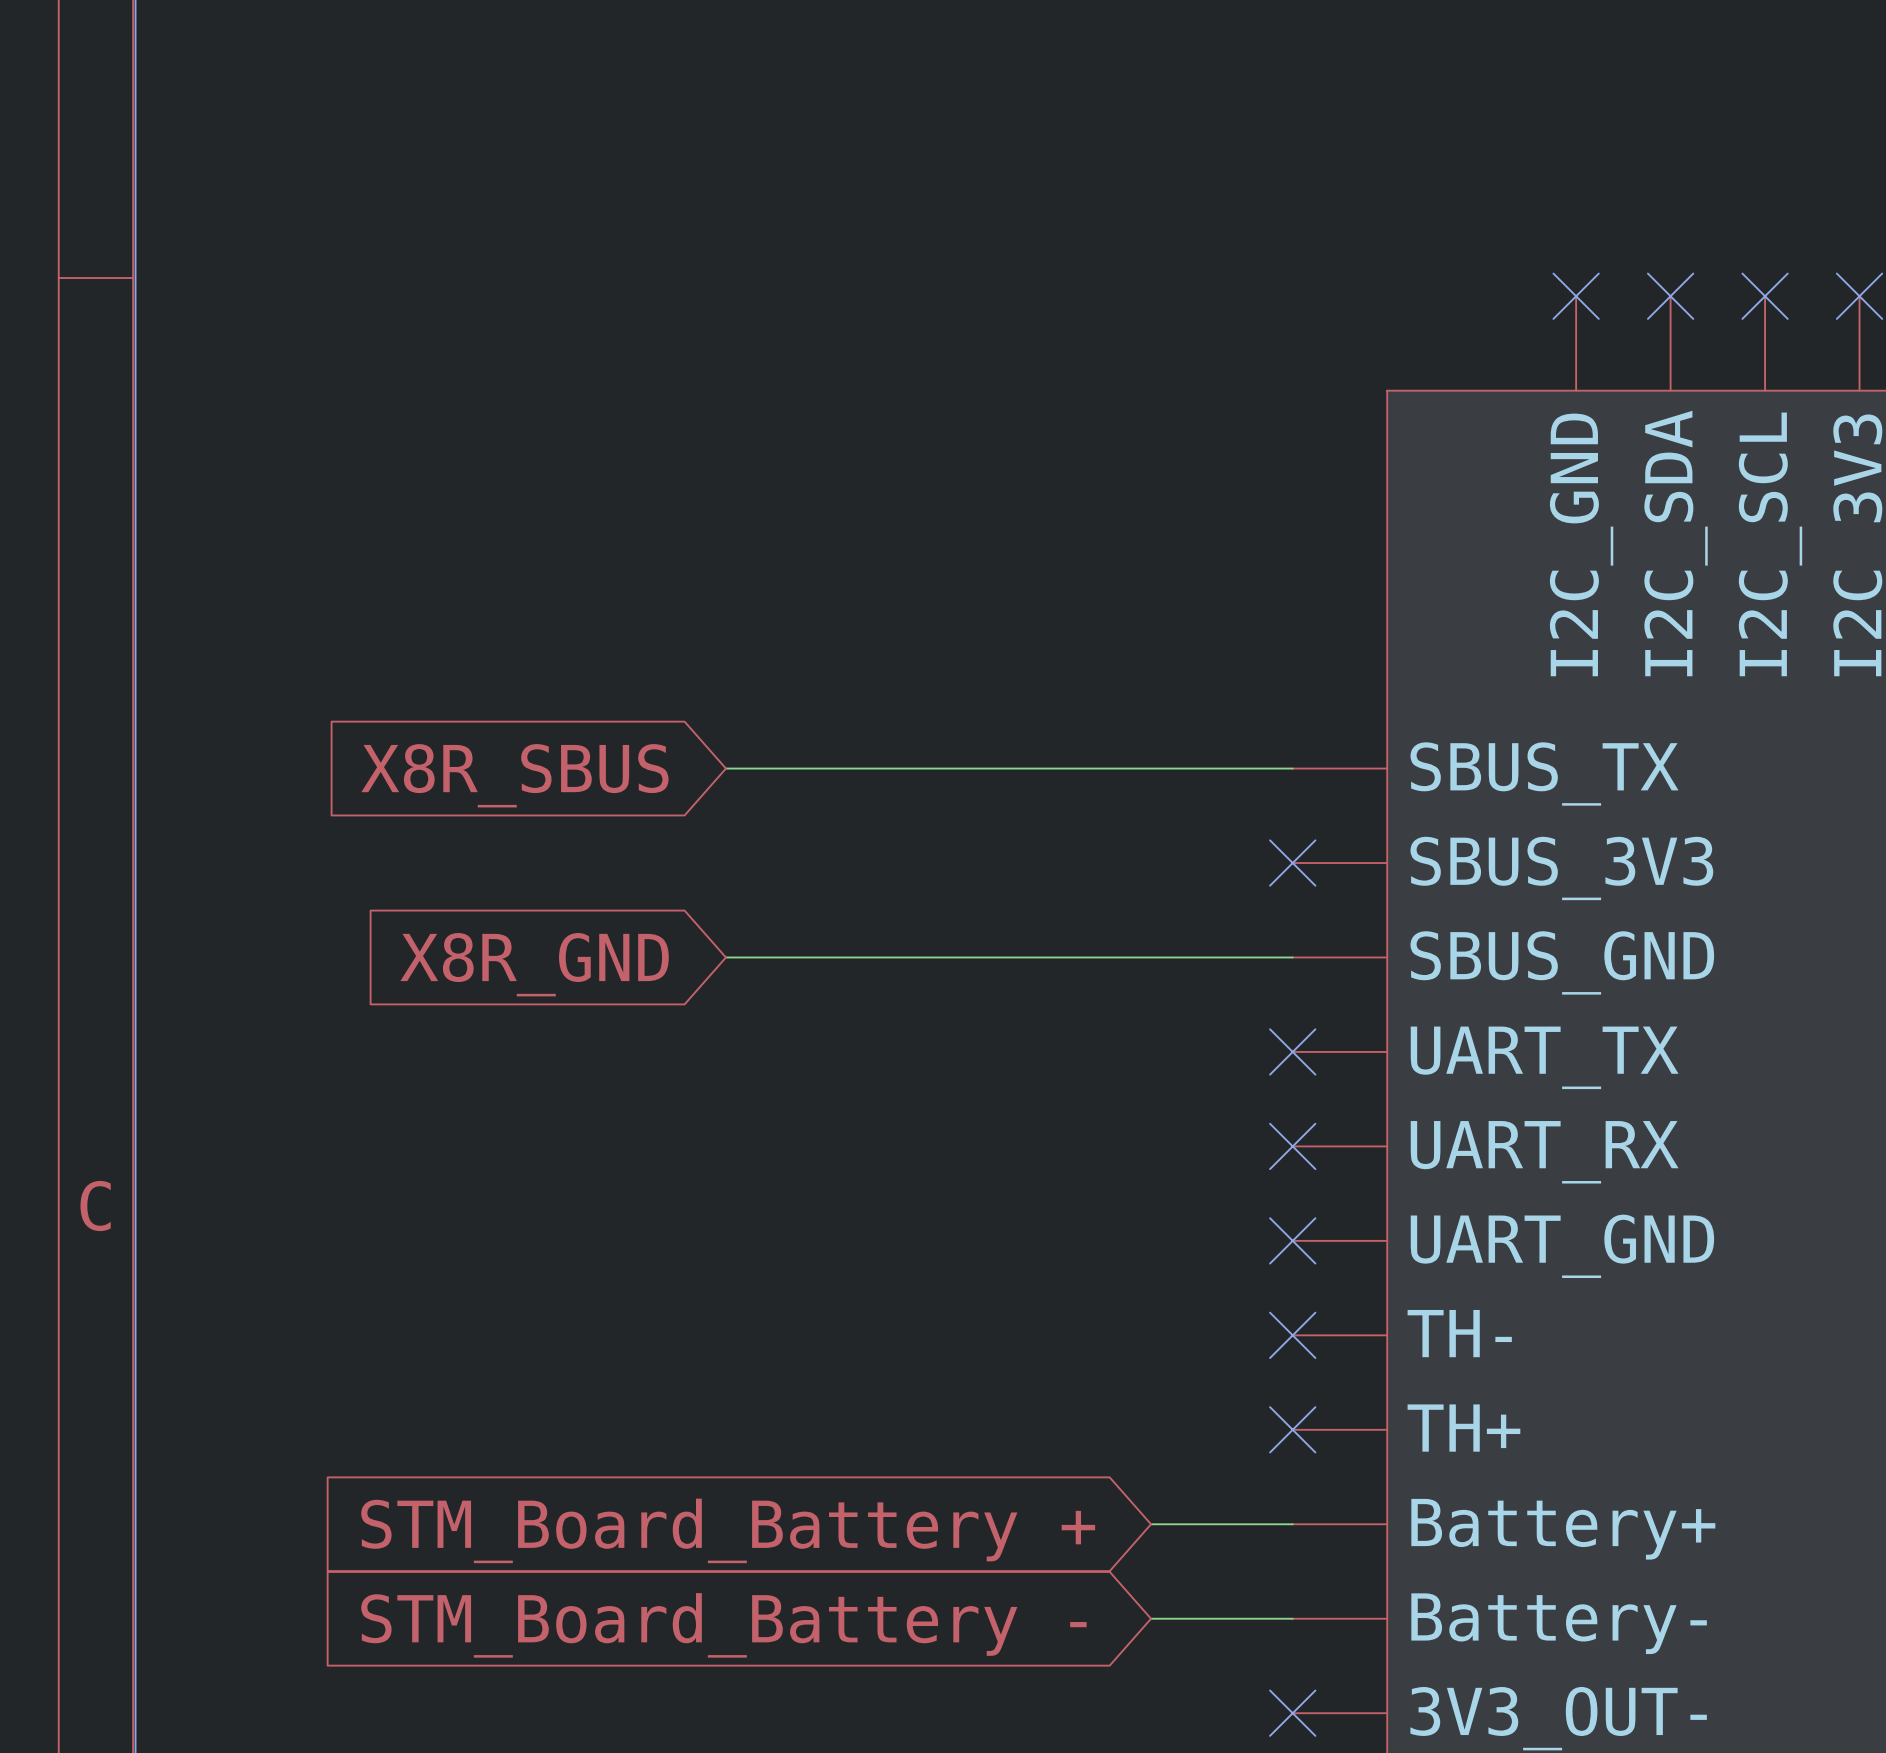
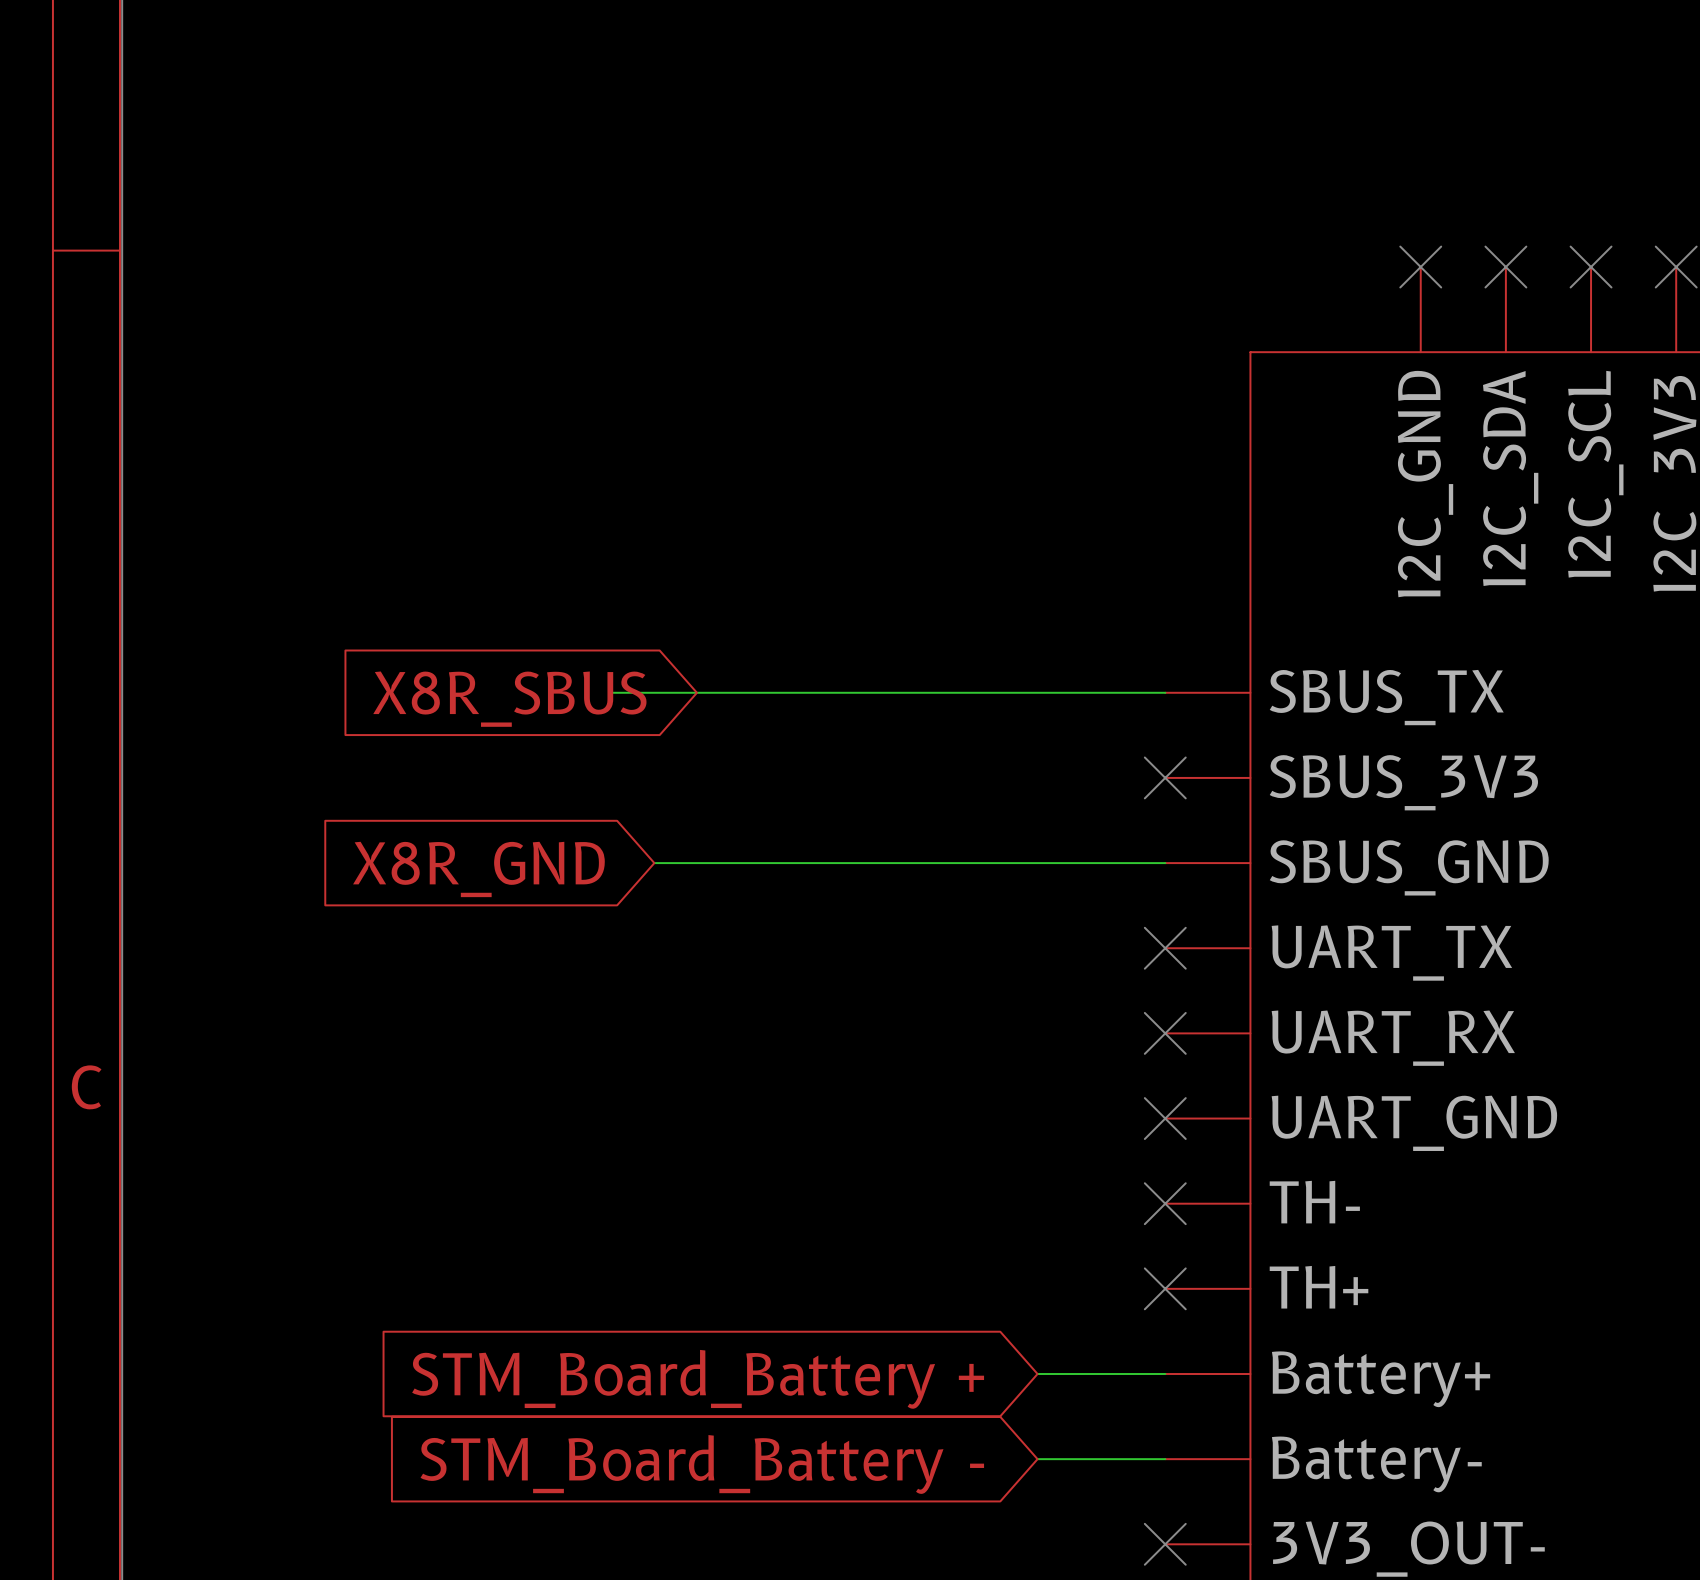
wire: none -> (611, 692) (654, 692)
global label position: X8R_SBUS (514, 775) -> X8R_SBUS (509, 699)

